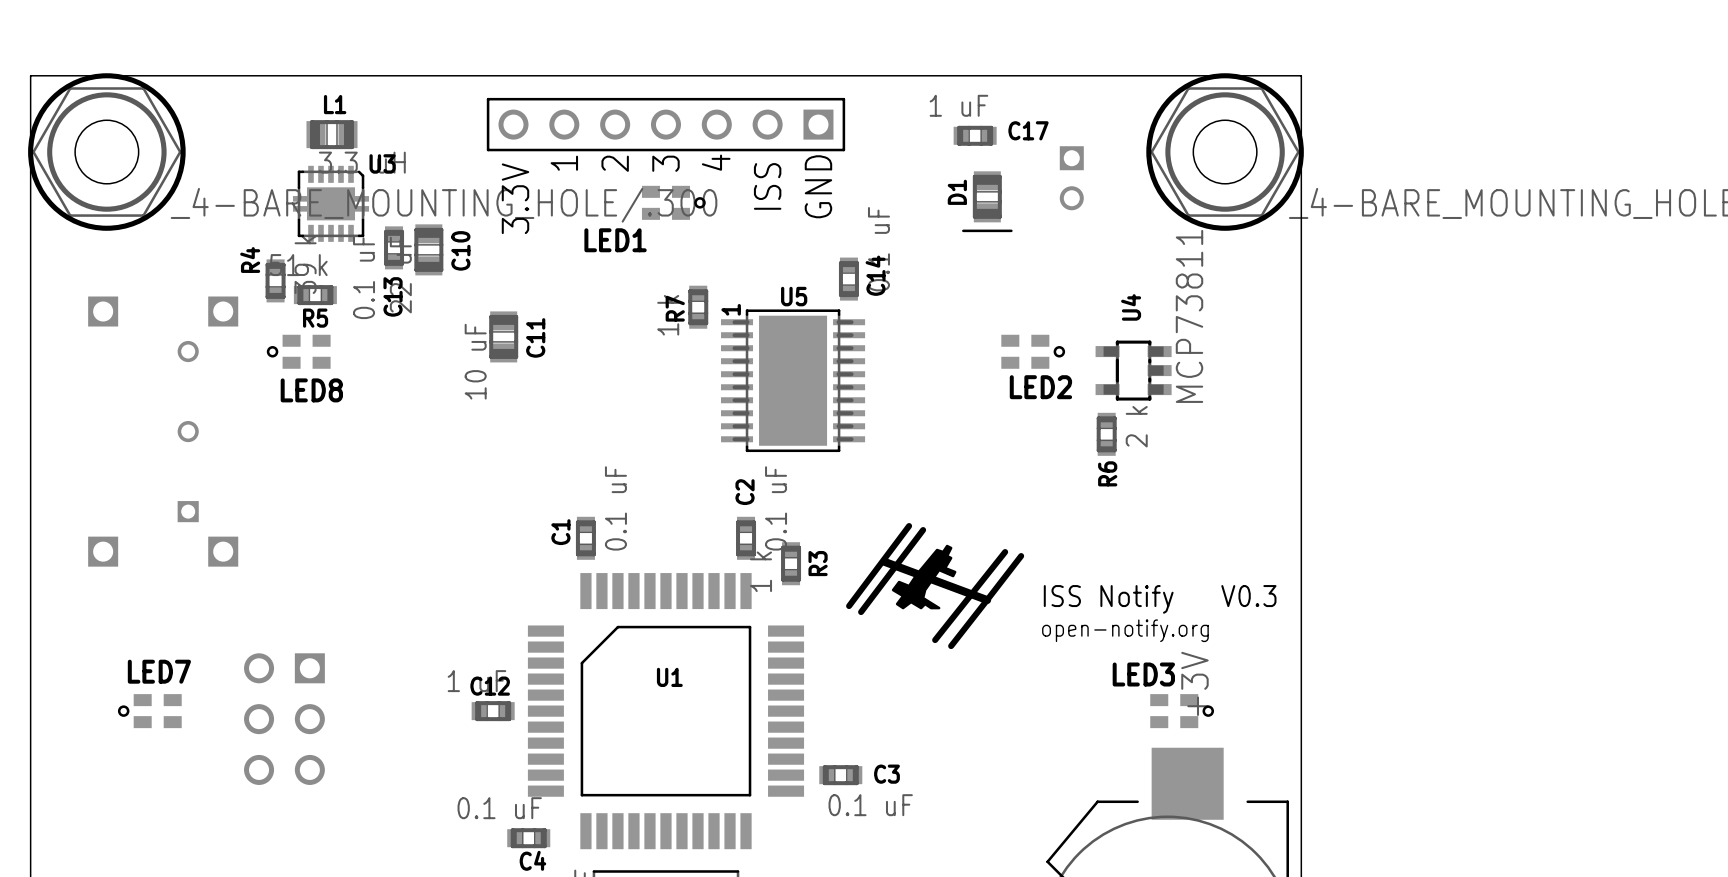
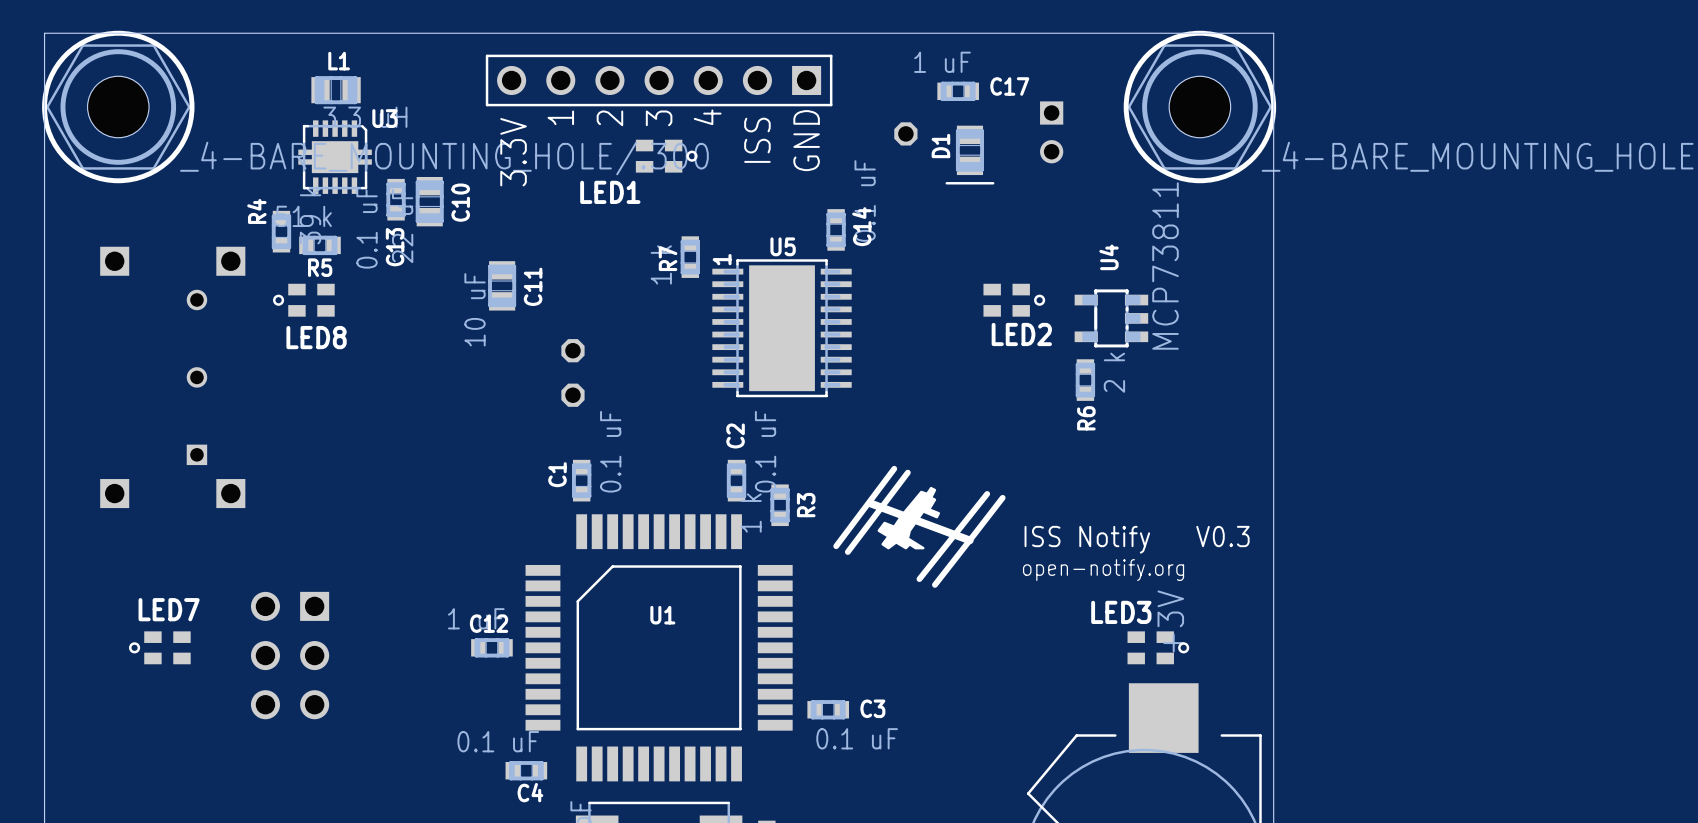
part: none -> (905, 133)
part: none -> (572, 350)
part: none -> (572, 395)

